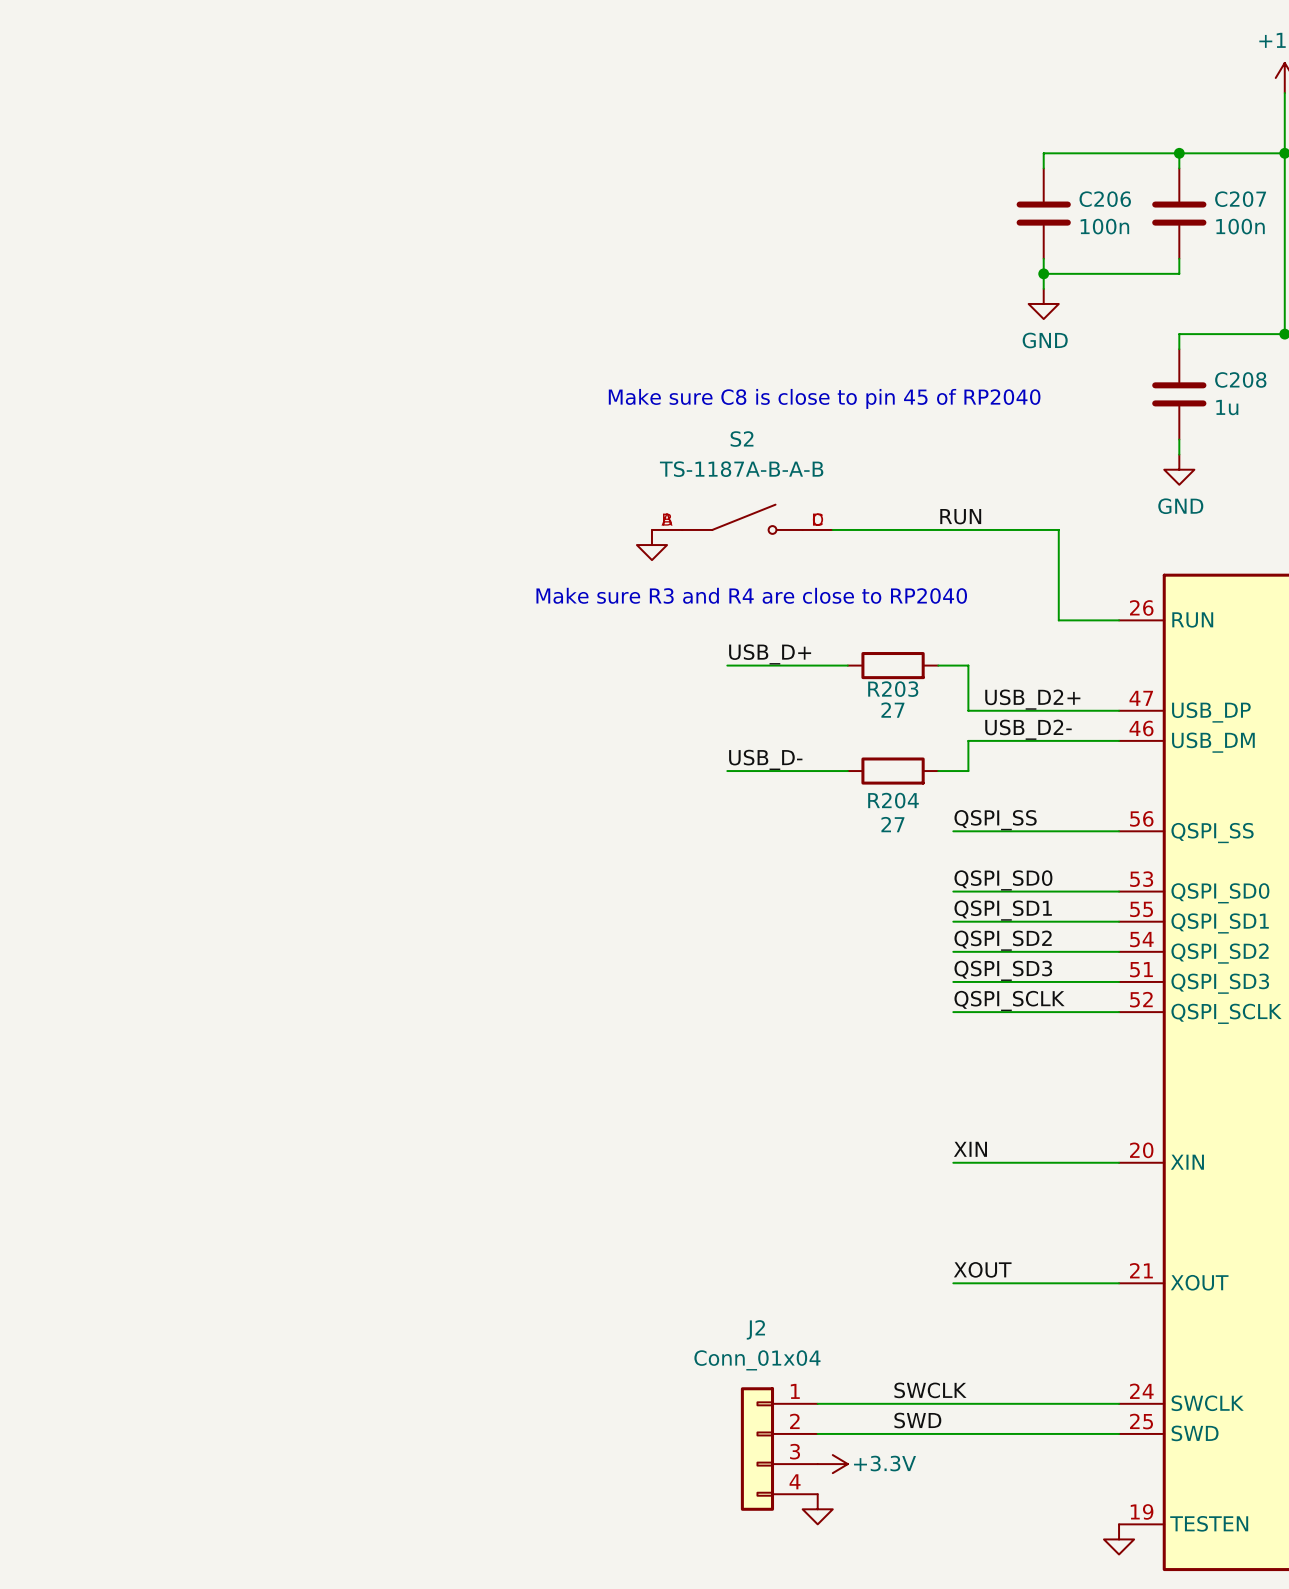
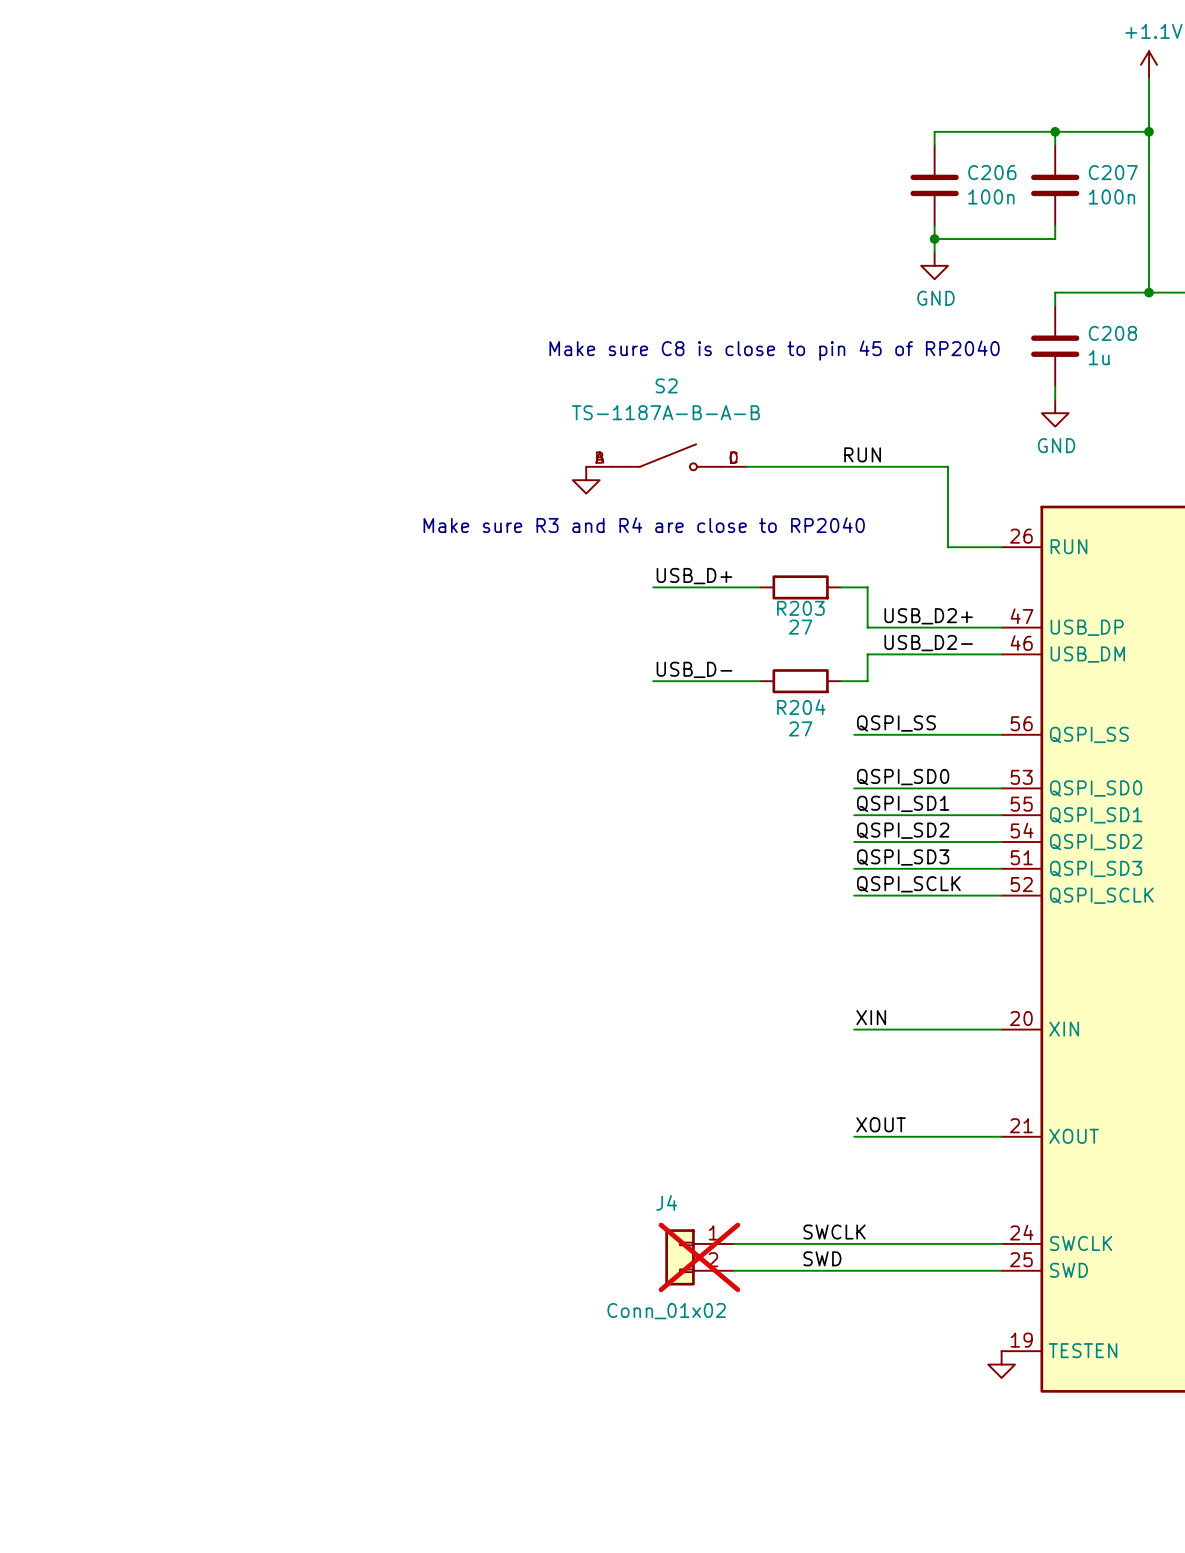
J4: none -> Conn_01x02 (699, 1257)
J2: Conn_01x04 (779, 1449) -> none
power symbol: +3.3V (832, 1464) -> none
power symbol: (817, 1509) -> none

